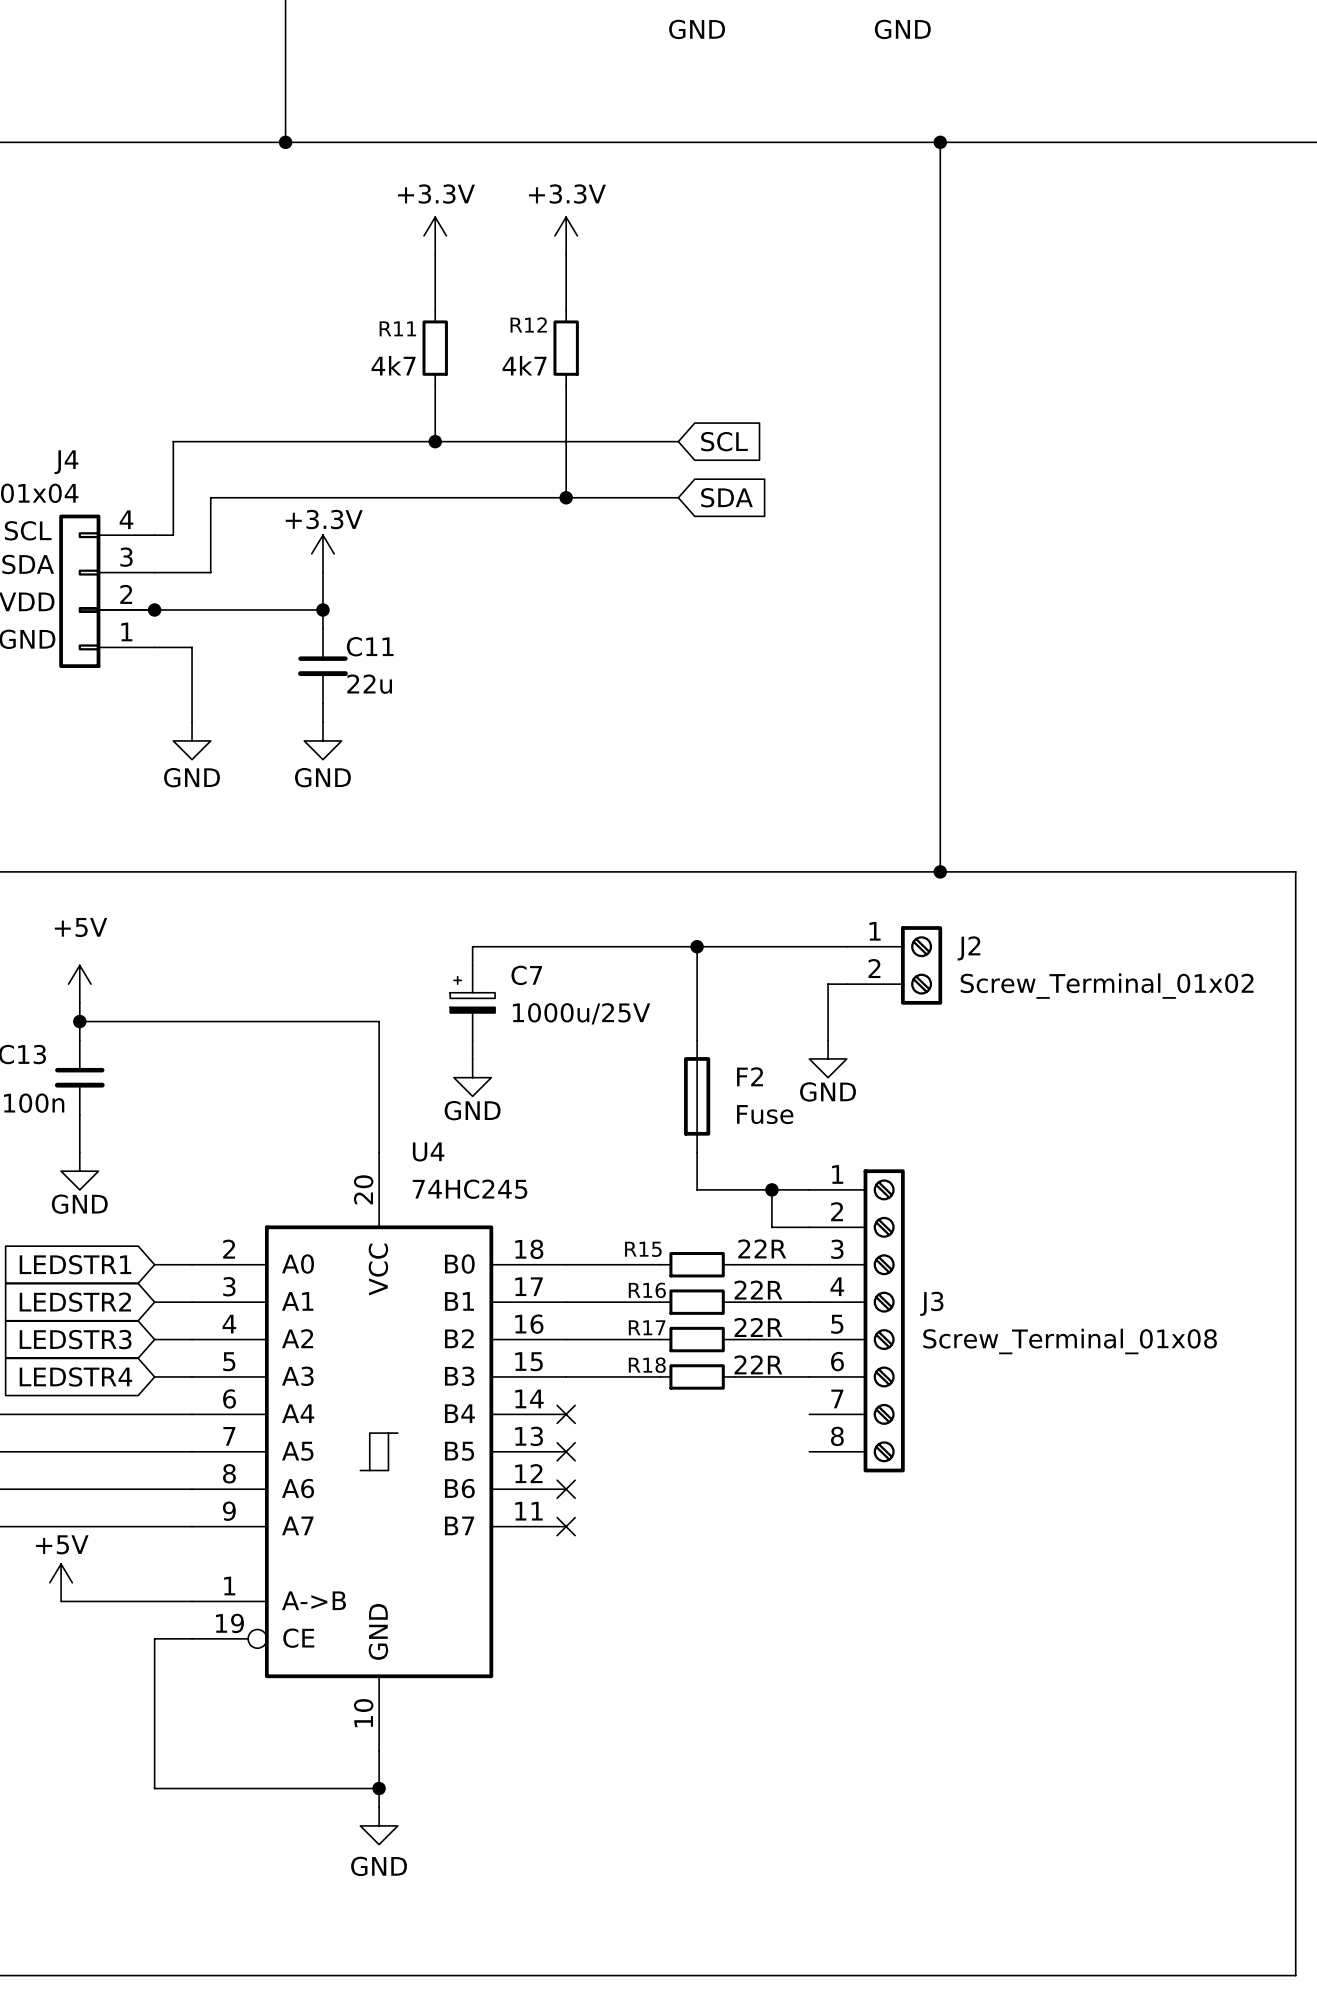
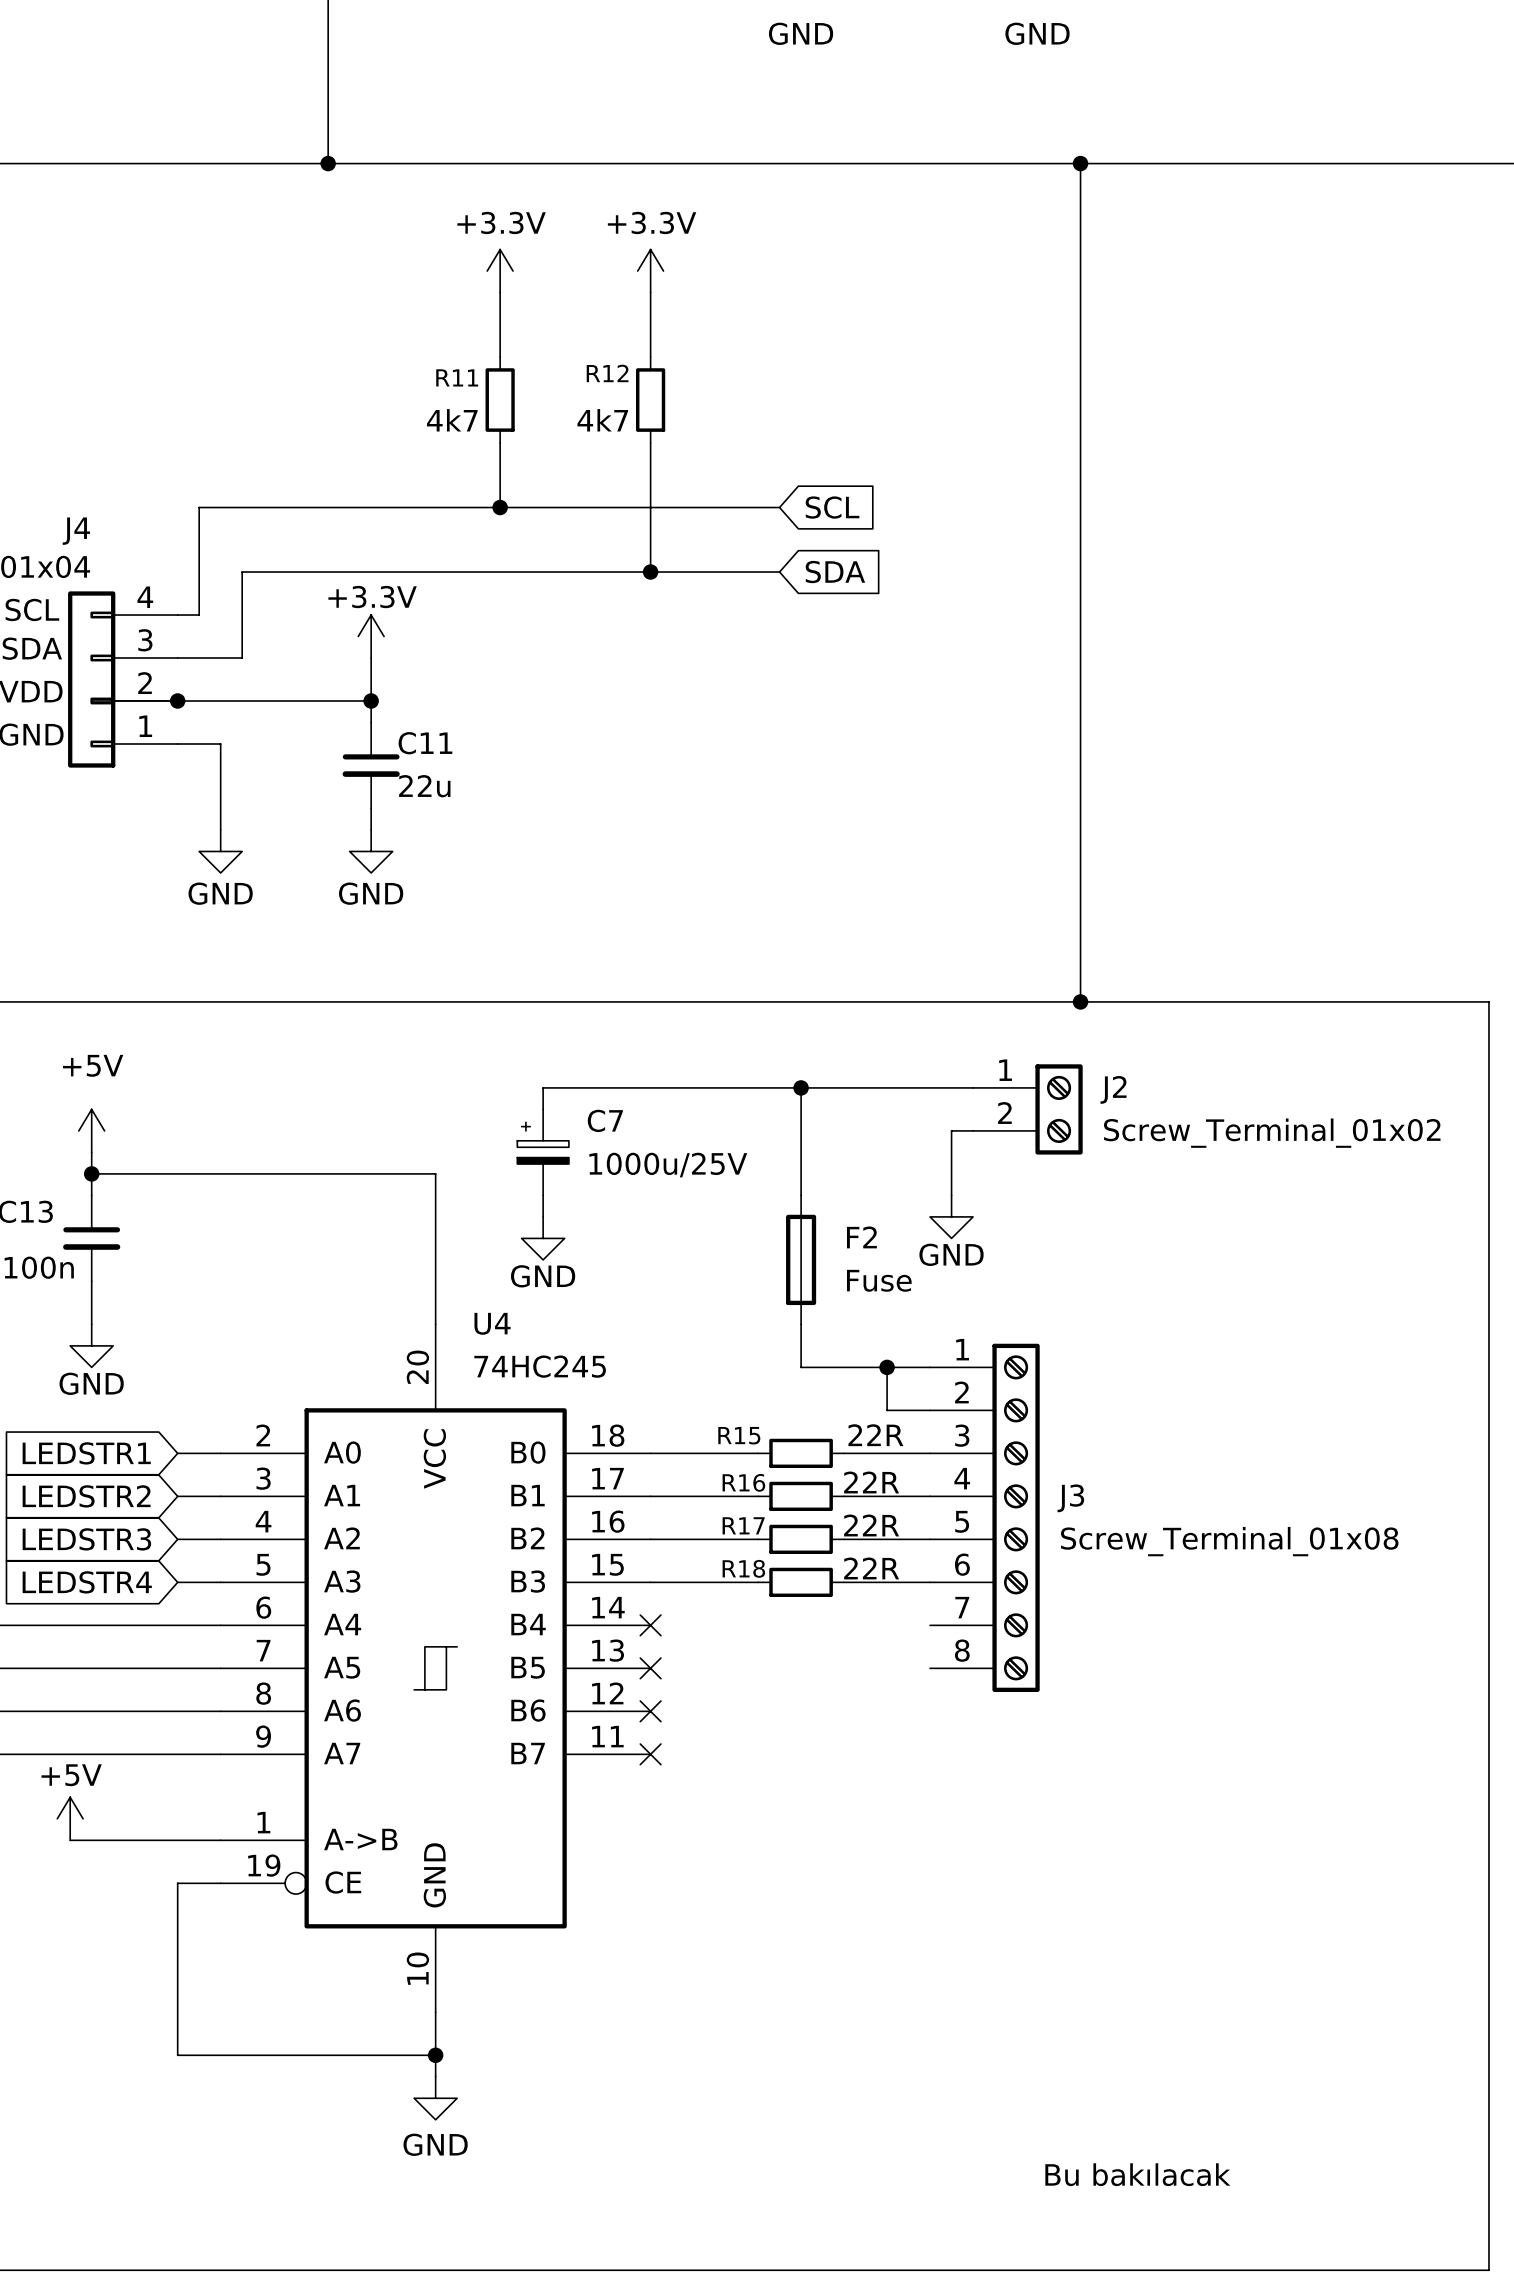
text: none -> Bu bakılacak (1137, 2174)

